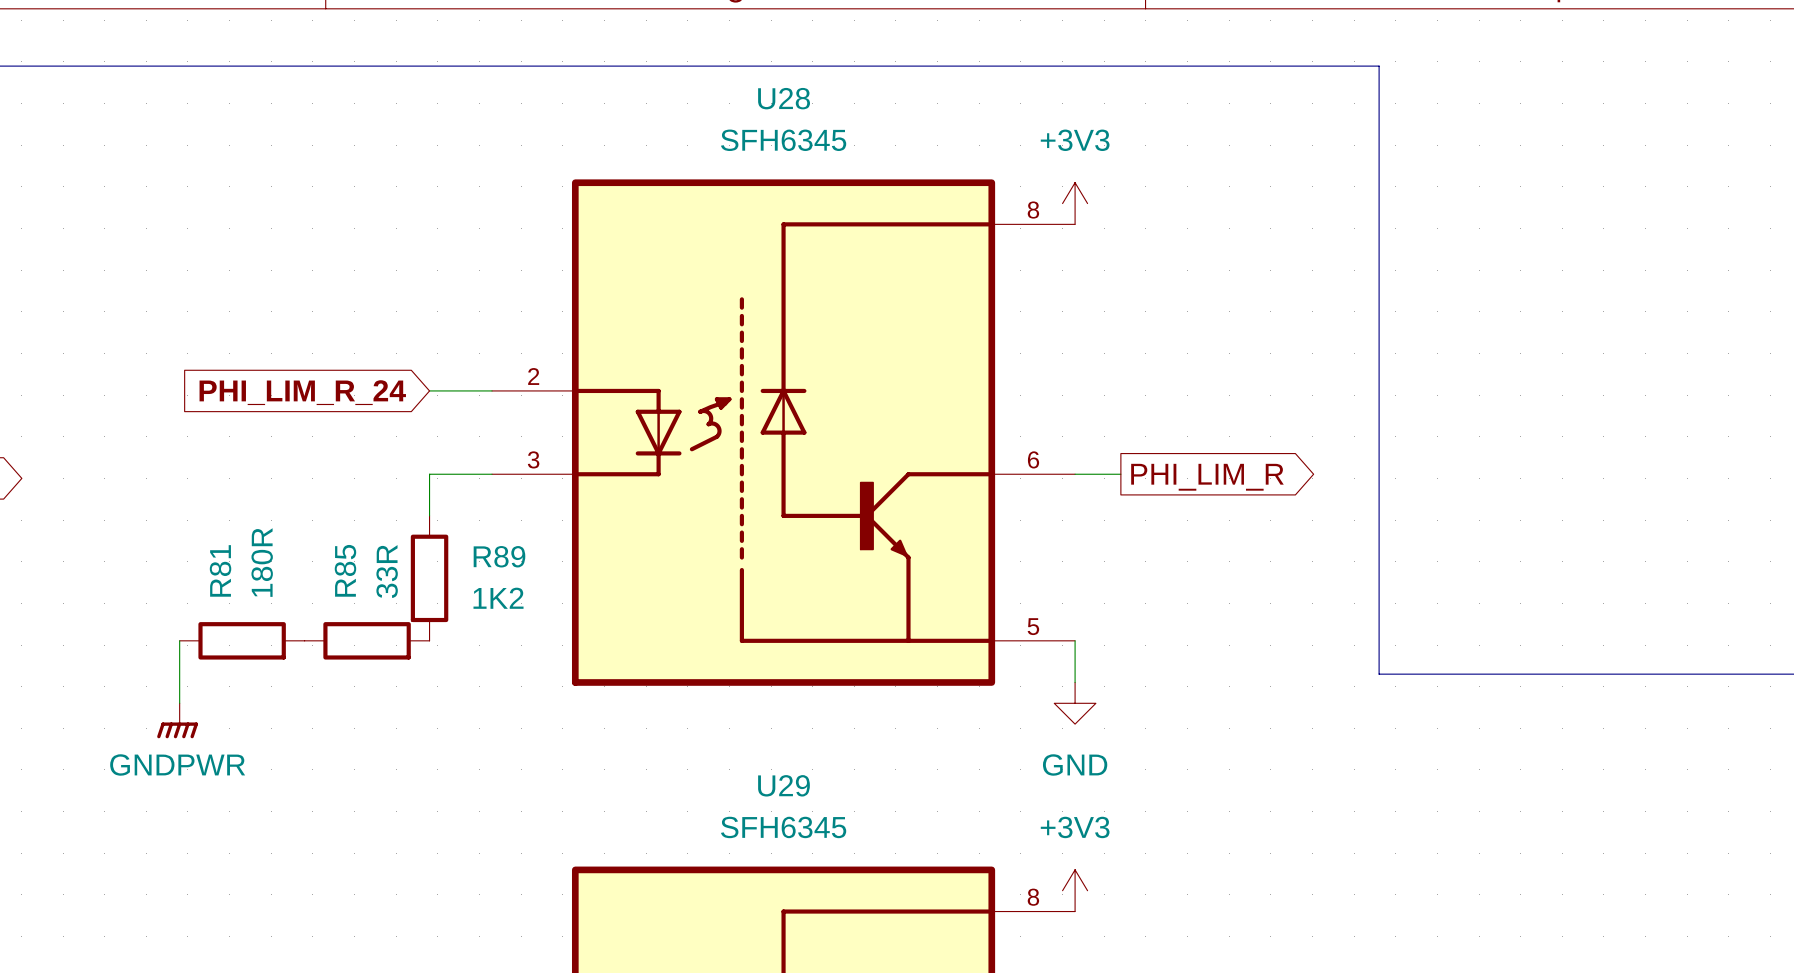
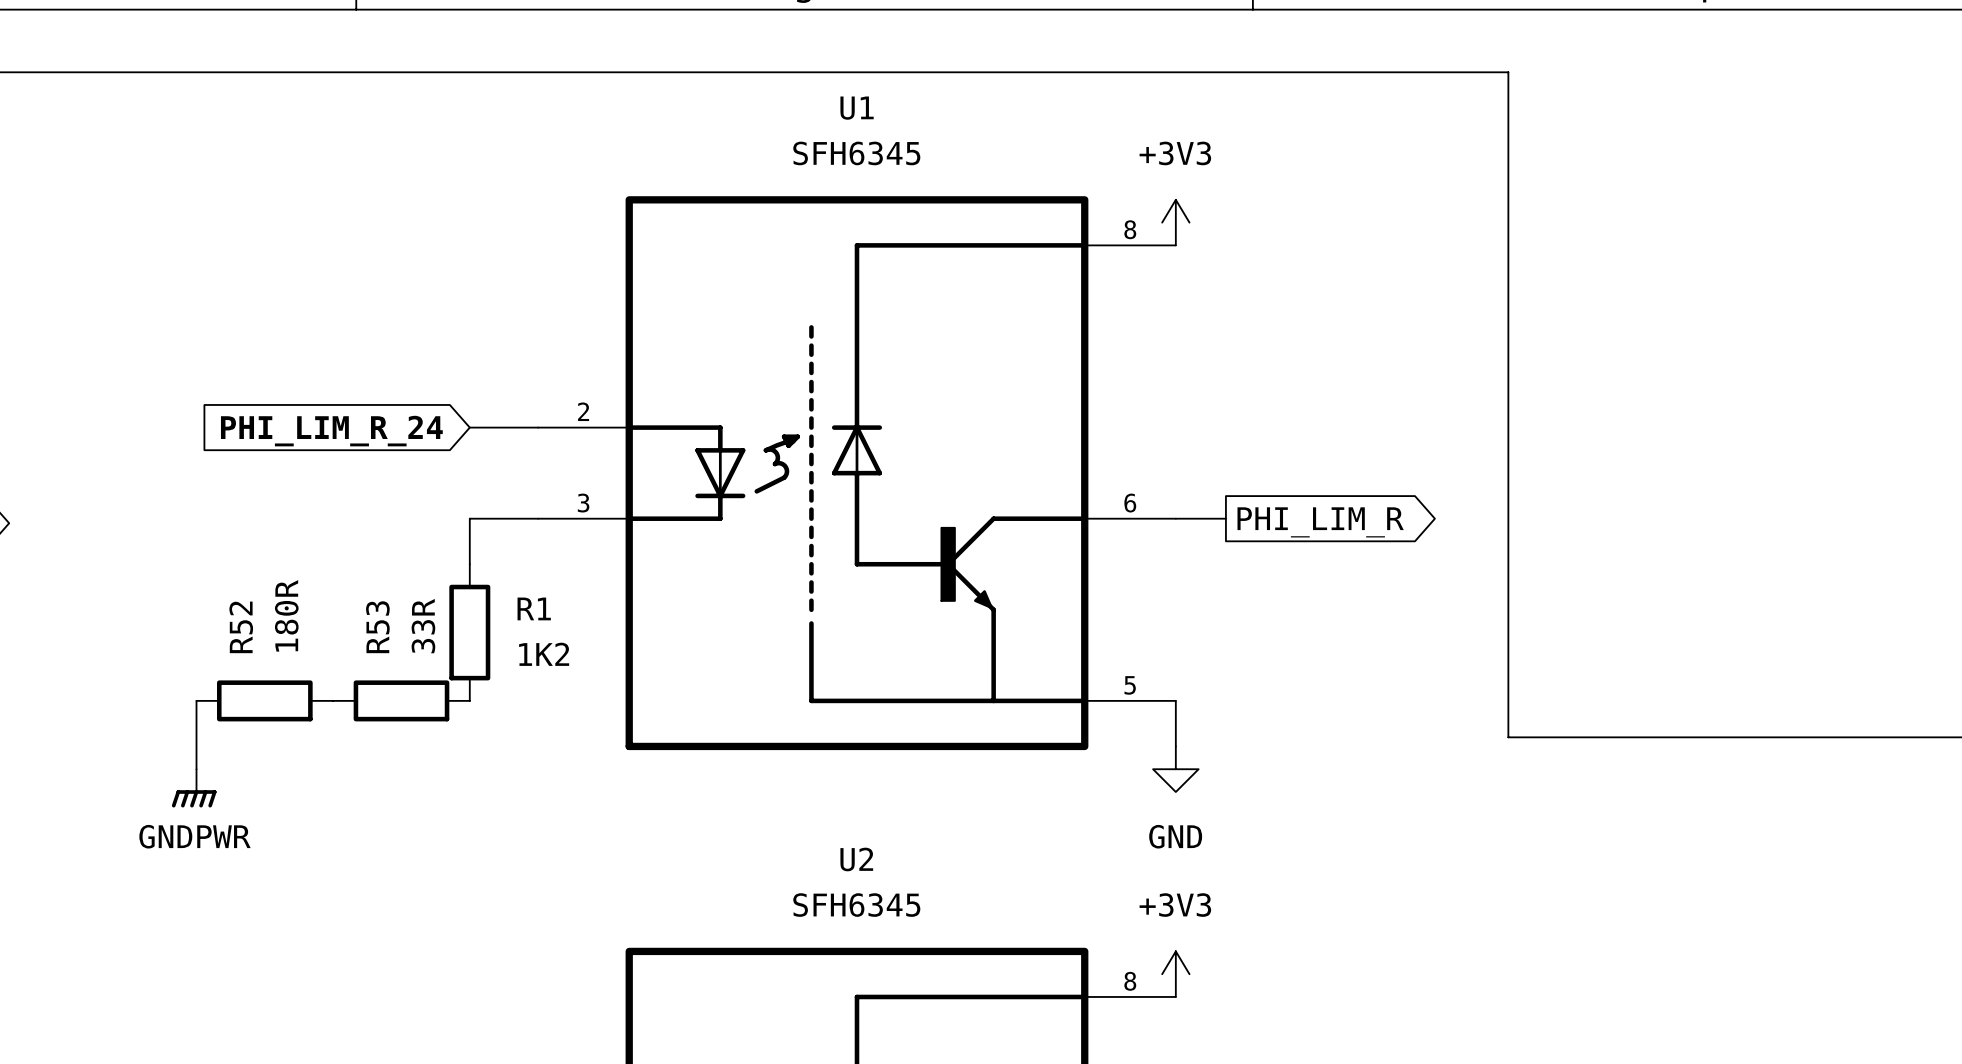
U28 name: U28 (784, 98) -> U1 (857, 108)
R89 name: R89 (499, 556) -> R1 (534, 608)
R81 name: R81 (220, 570) -> R52 (241, 627)
R85 name: R85 (345, 570) -> R53 (377, 627)
U29 name: U29 (784, 785) -> U2 (856, 859)

